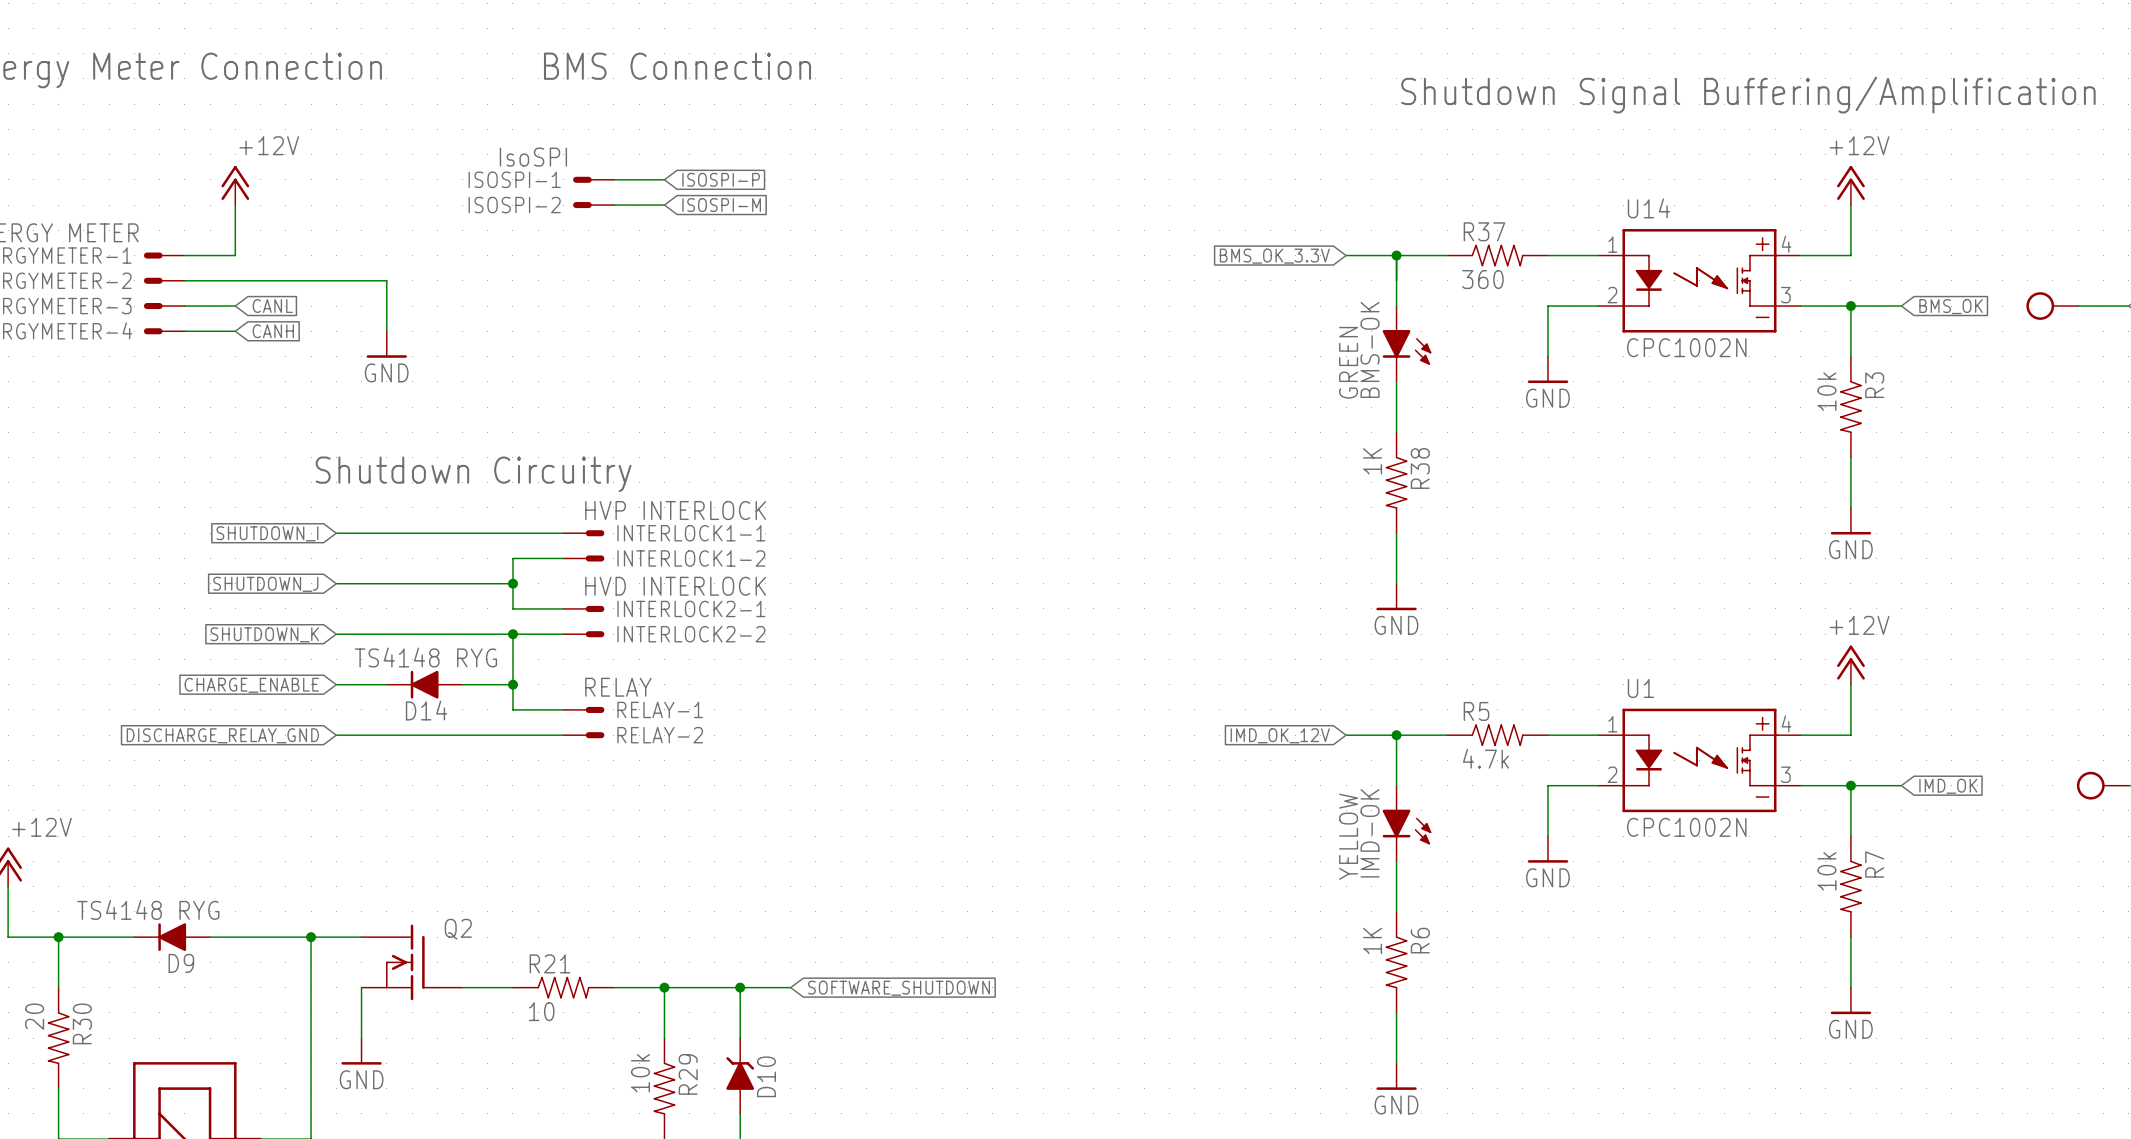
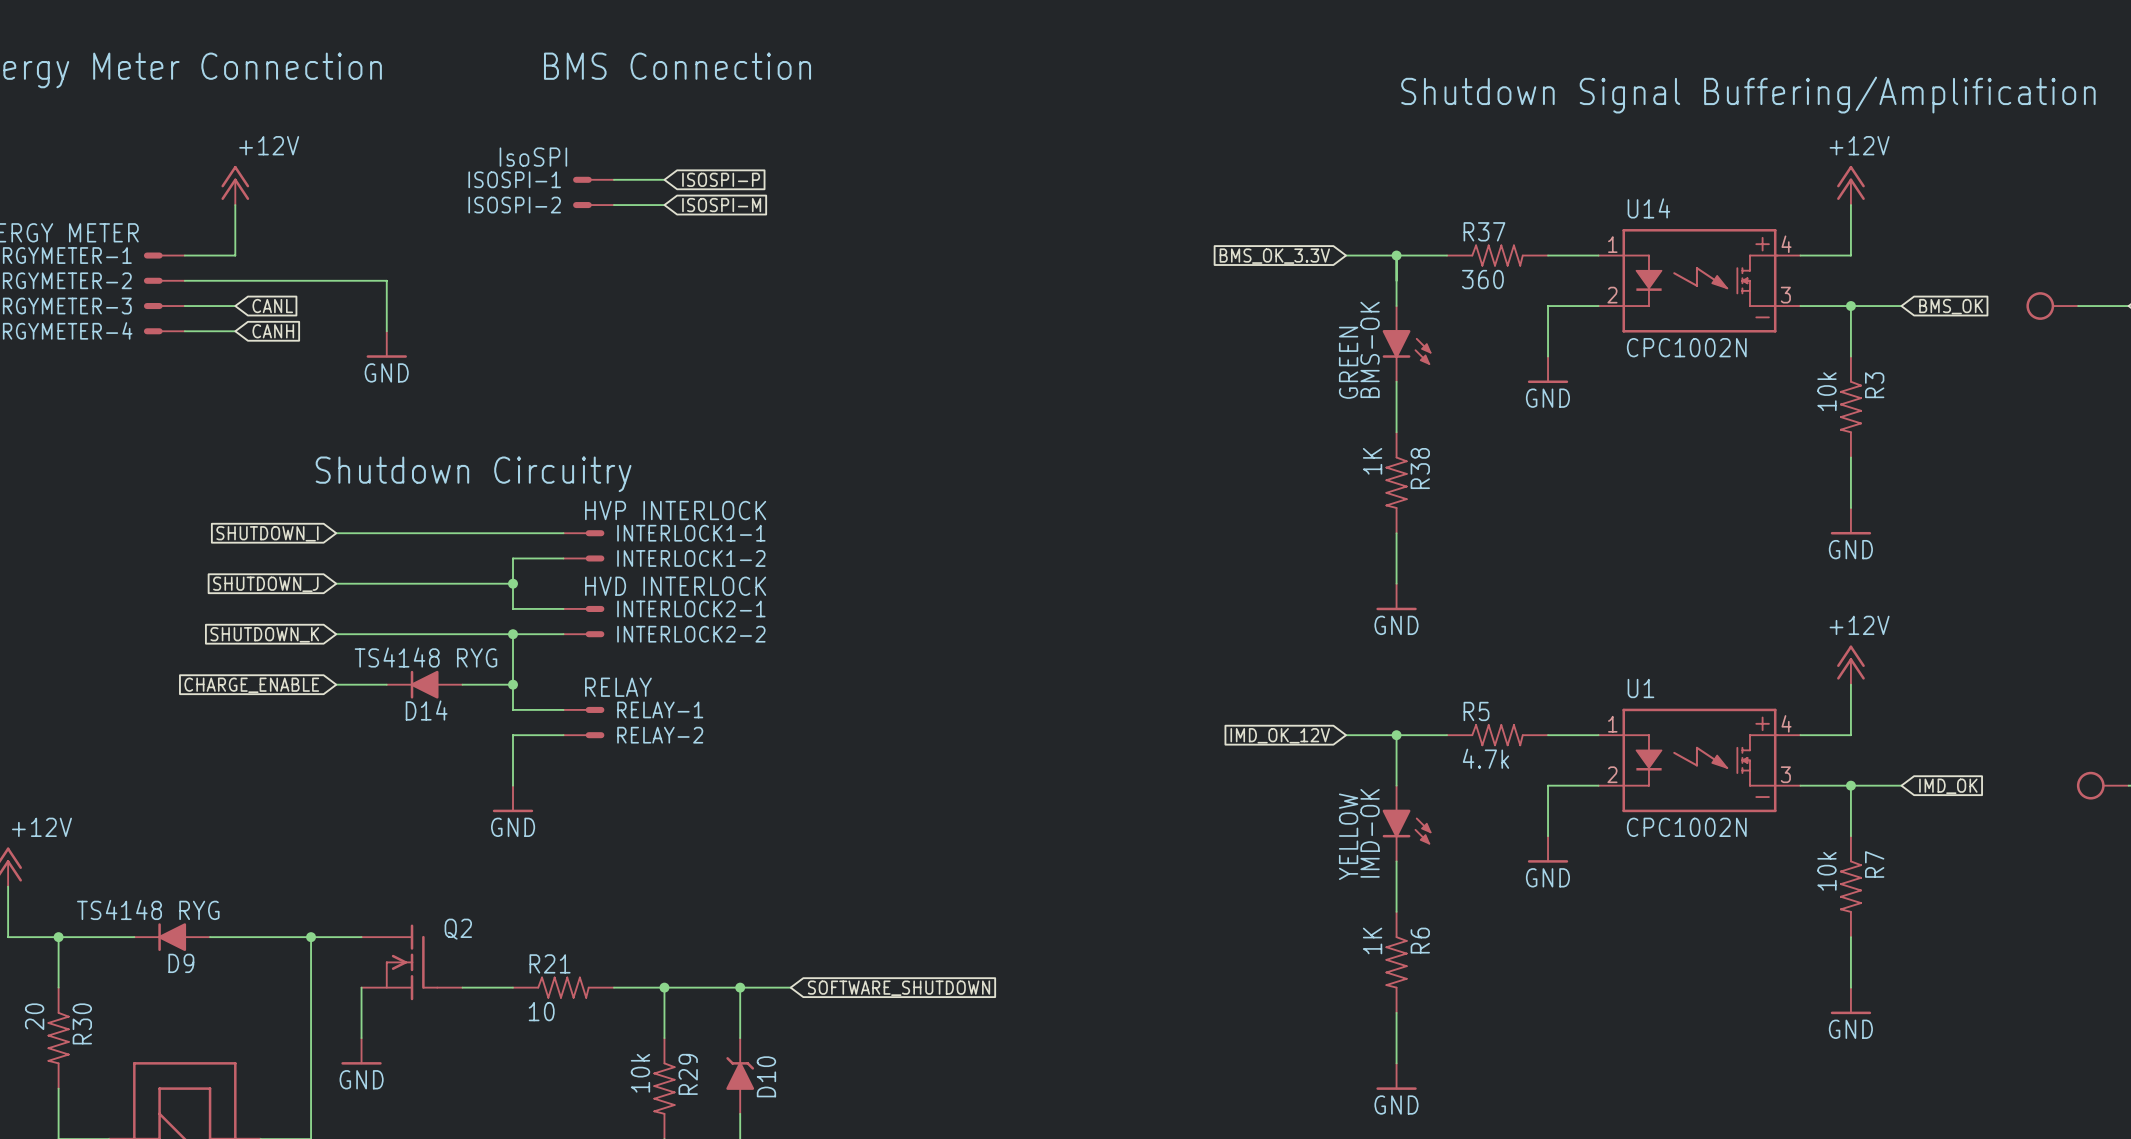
global label: DISCHARGE_RELAY_GND (222, 735) -> none
wire: (336, 735) (512, 735) -> (512, 785) (512, 735)
power symbol: none -> GND (512, 798)

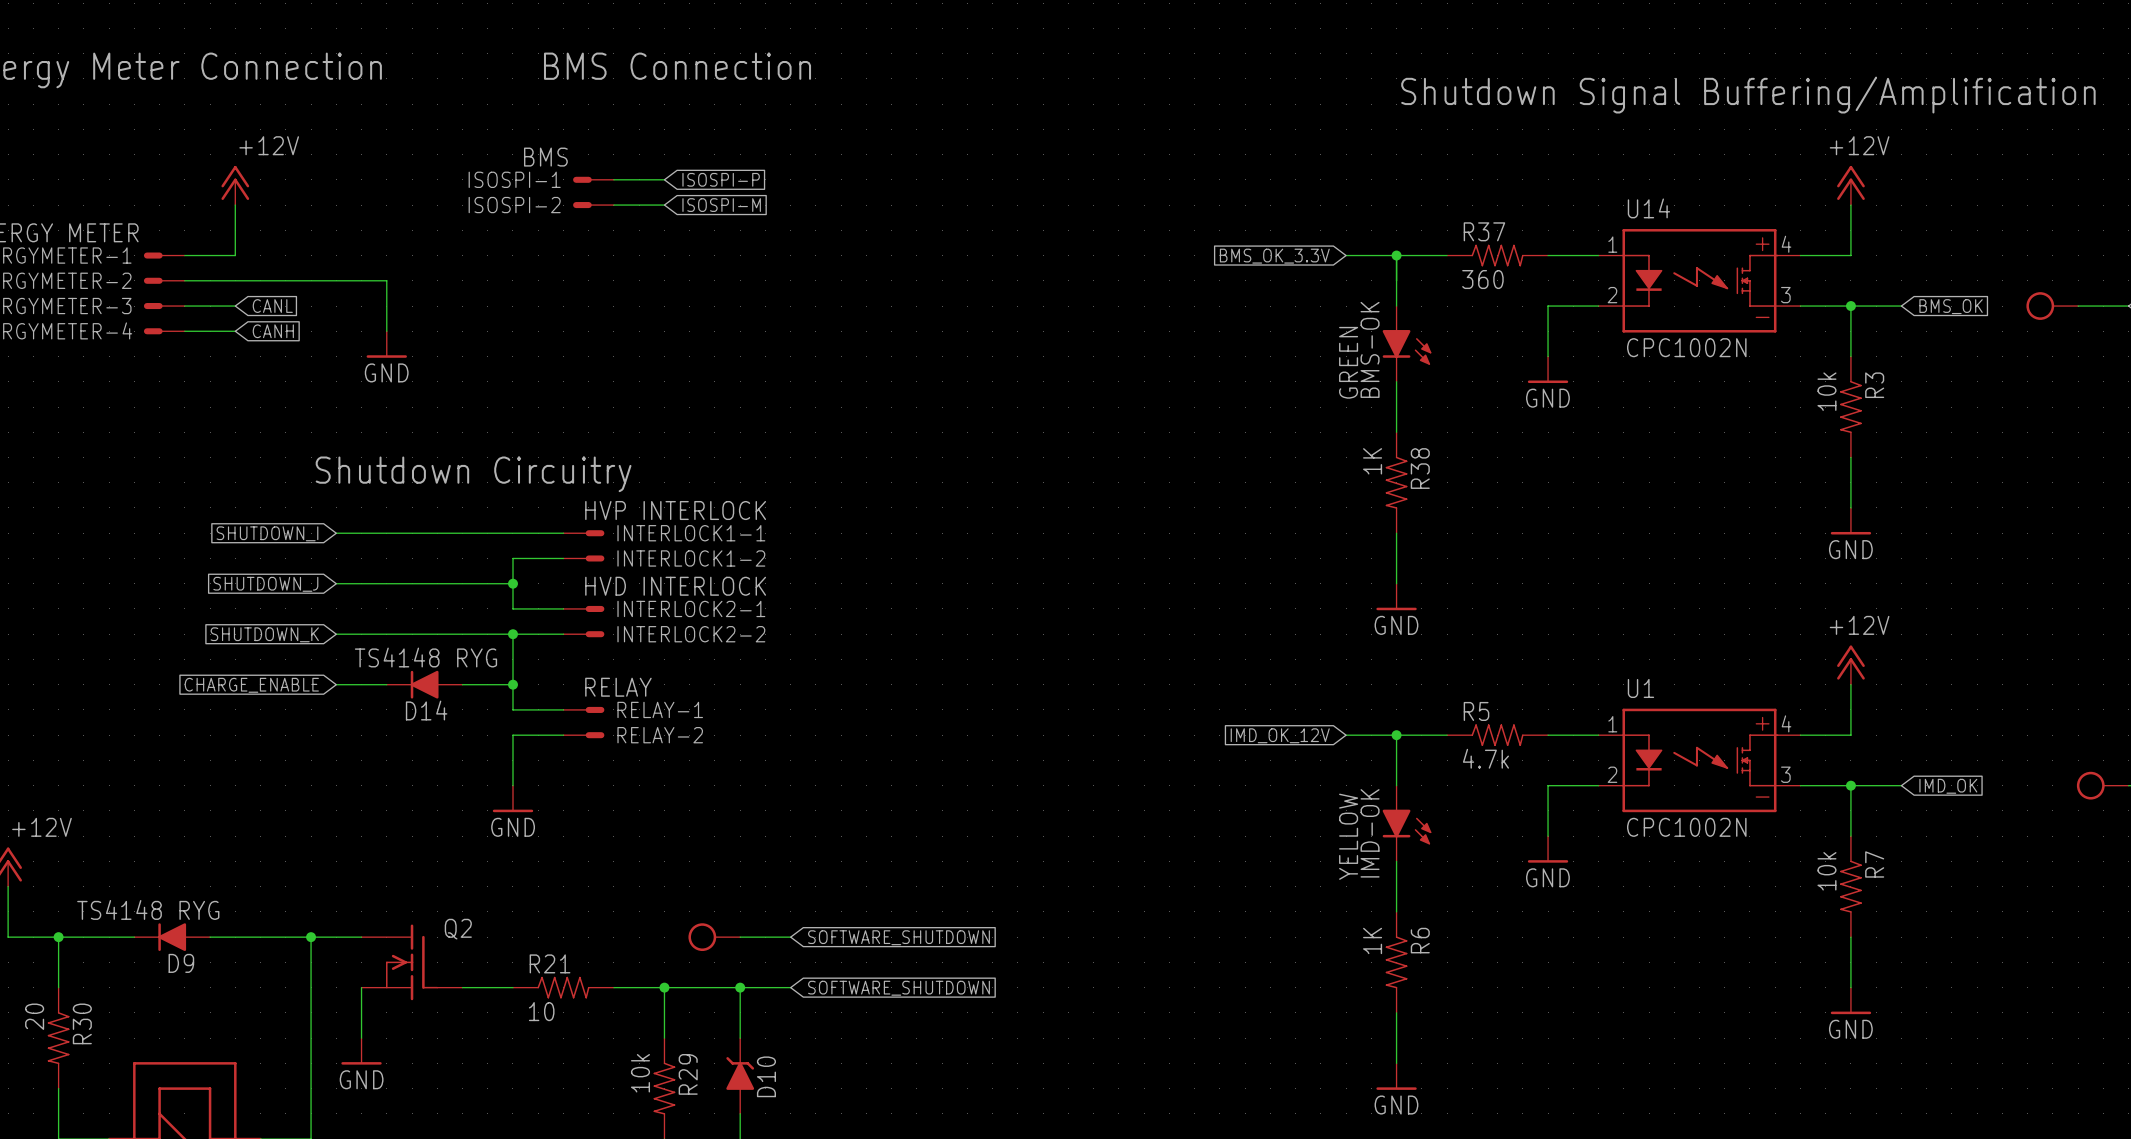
ISOSPI-1 value: IsoSPI (533, 157) -> BMS (545, 157)
part: none -> (714, 937)
wire: none -> (740, 937) (790, 937)
global label: none -> SOFTWARE_SHUTDOWN (899, 937)

